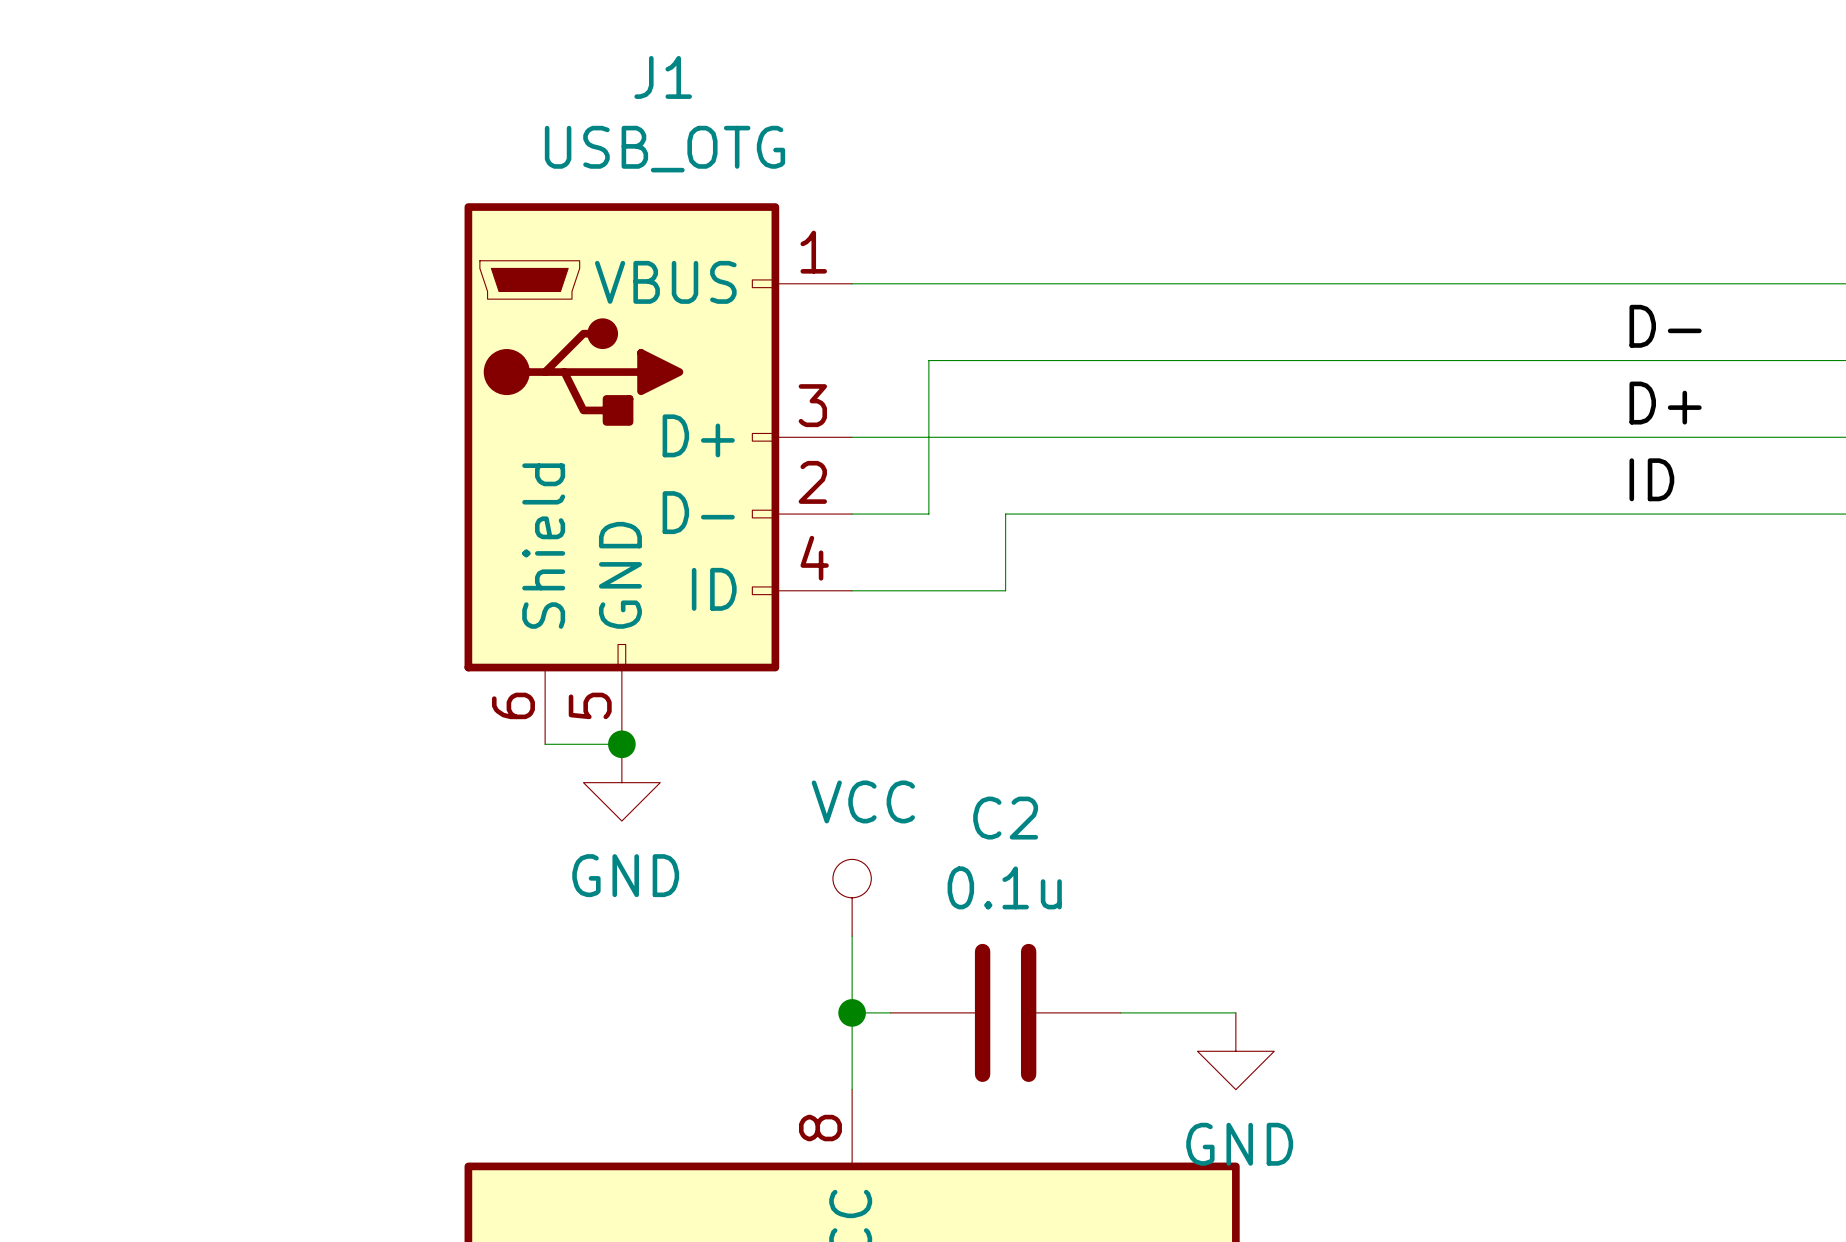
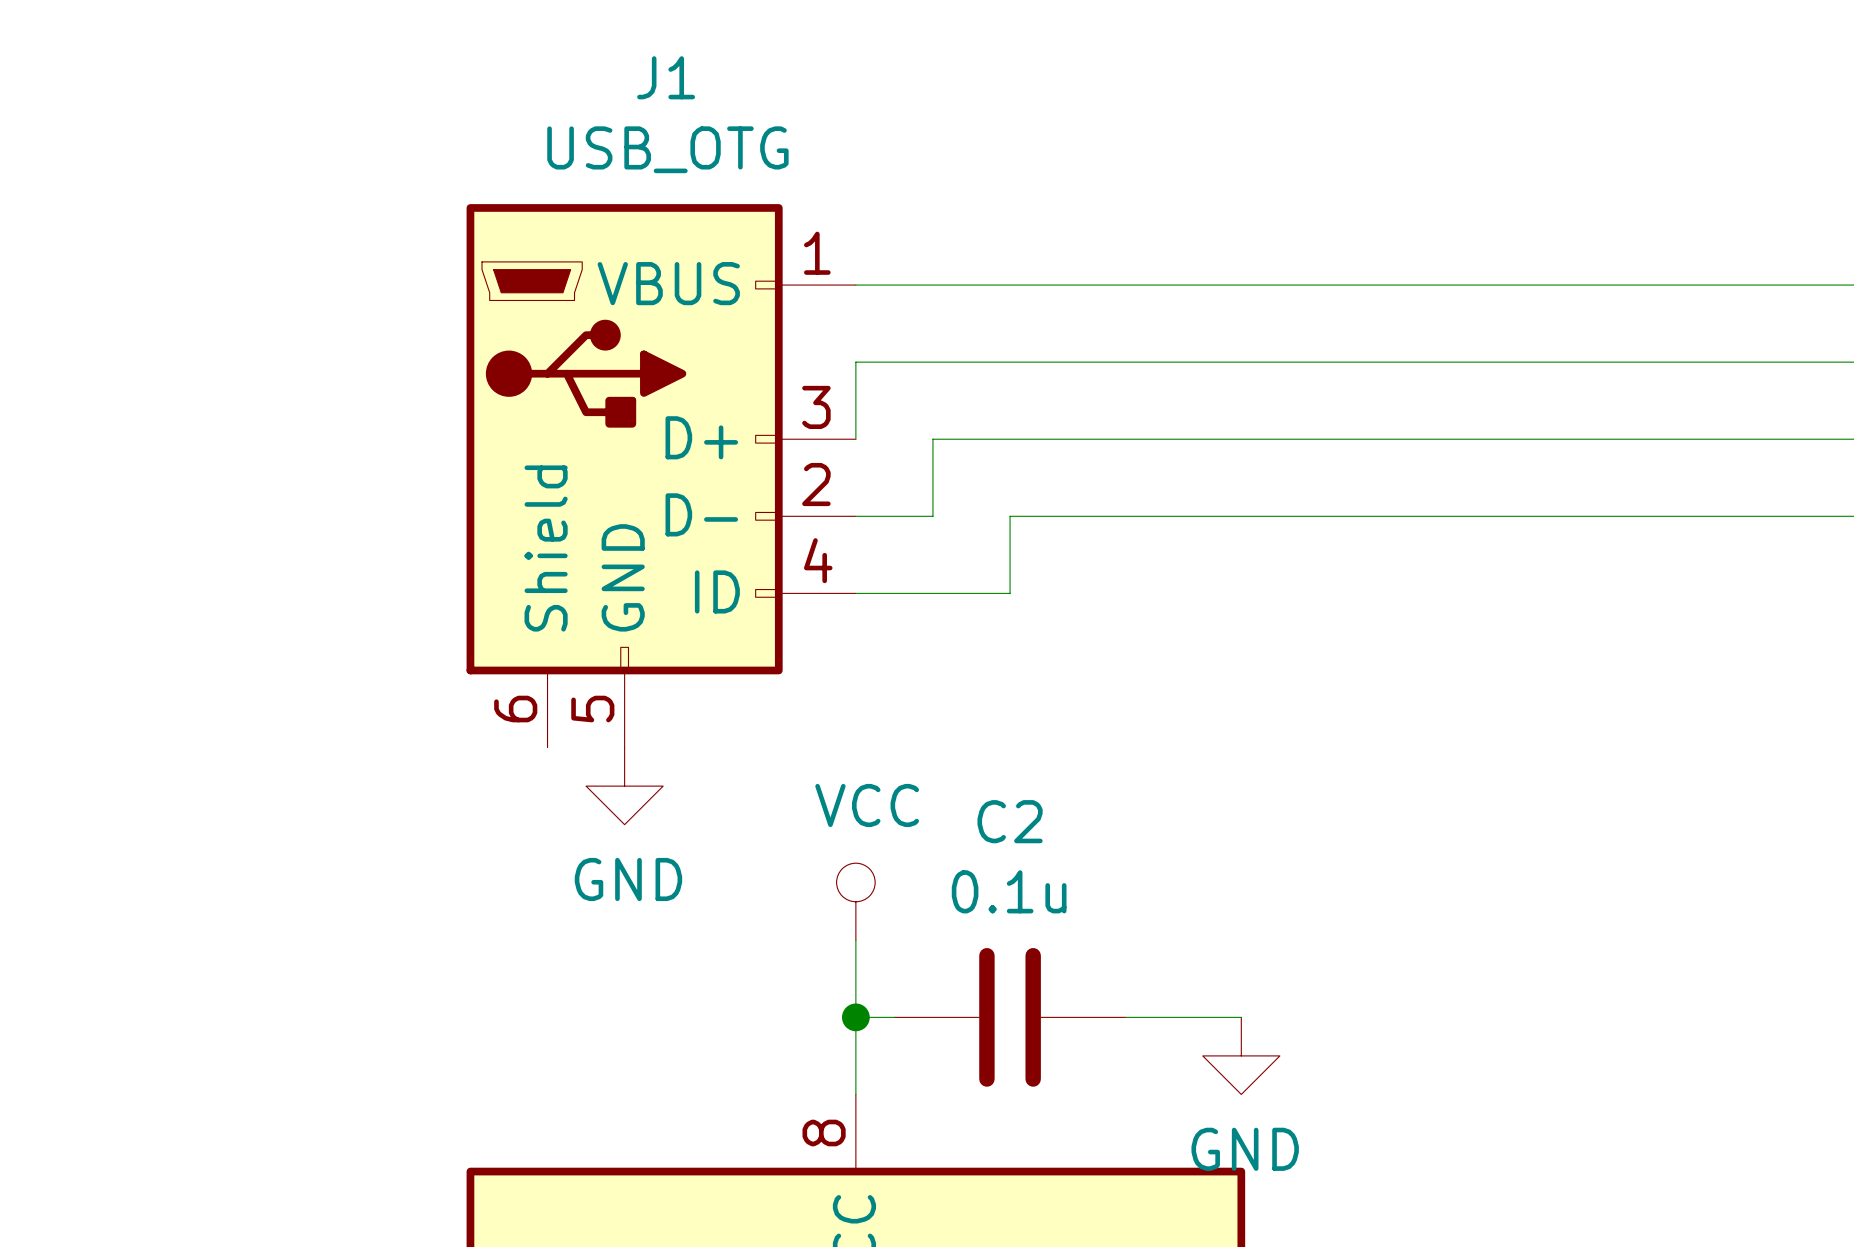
label: D- (1665, 326) -> none
wire: (928, 360) (928, 437) (852, 437) -> (932, 362) (855, 362) (855, 439)
label: D+ (1665, 403) -> none
label: ID (1651, 479) -> none
wire: (545, 744) (621, 744) -> none
junction: (621, 744) -> none

